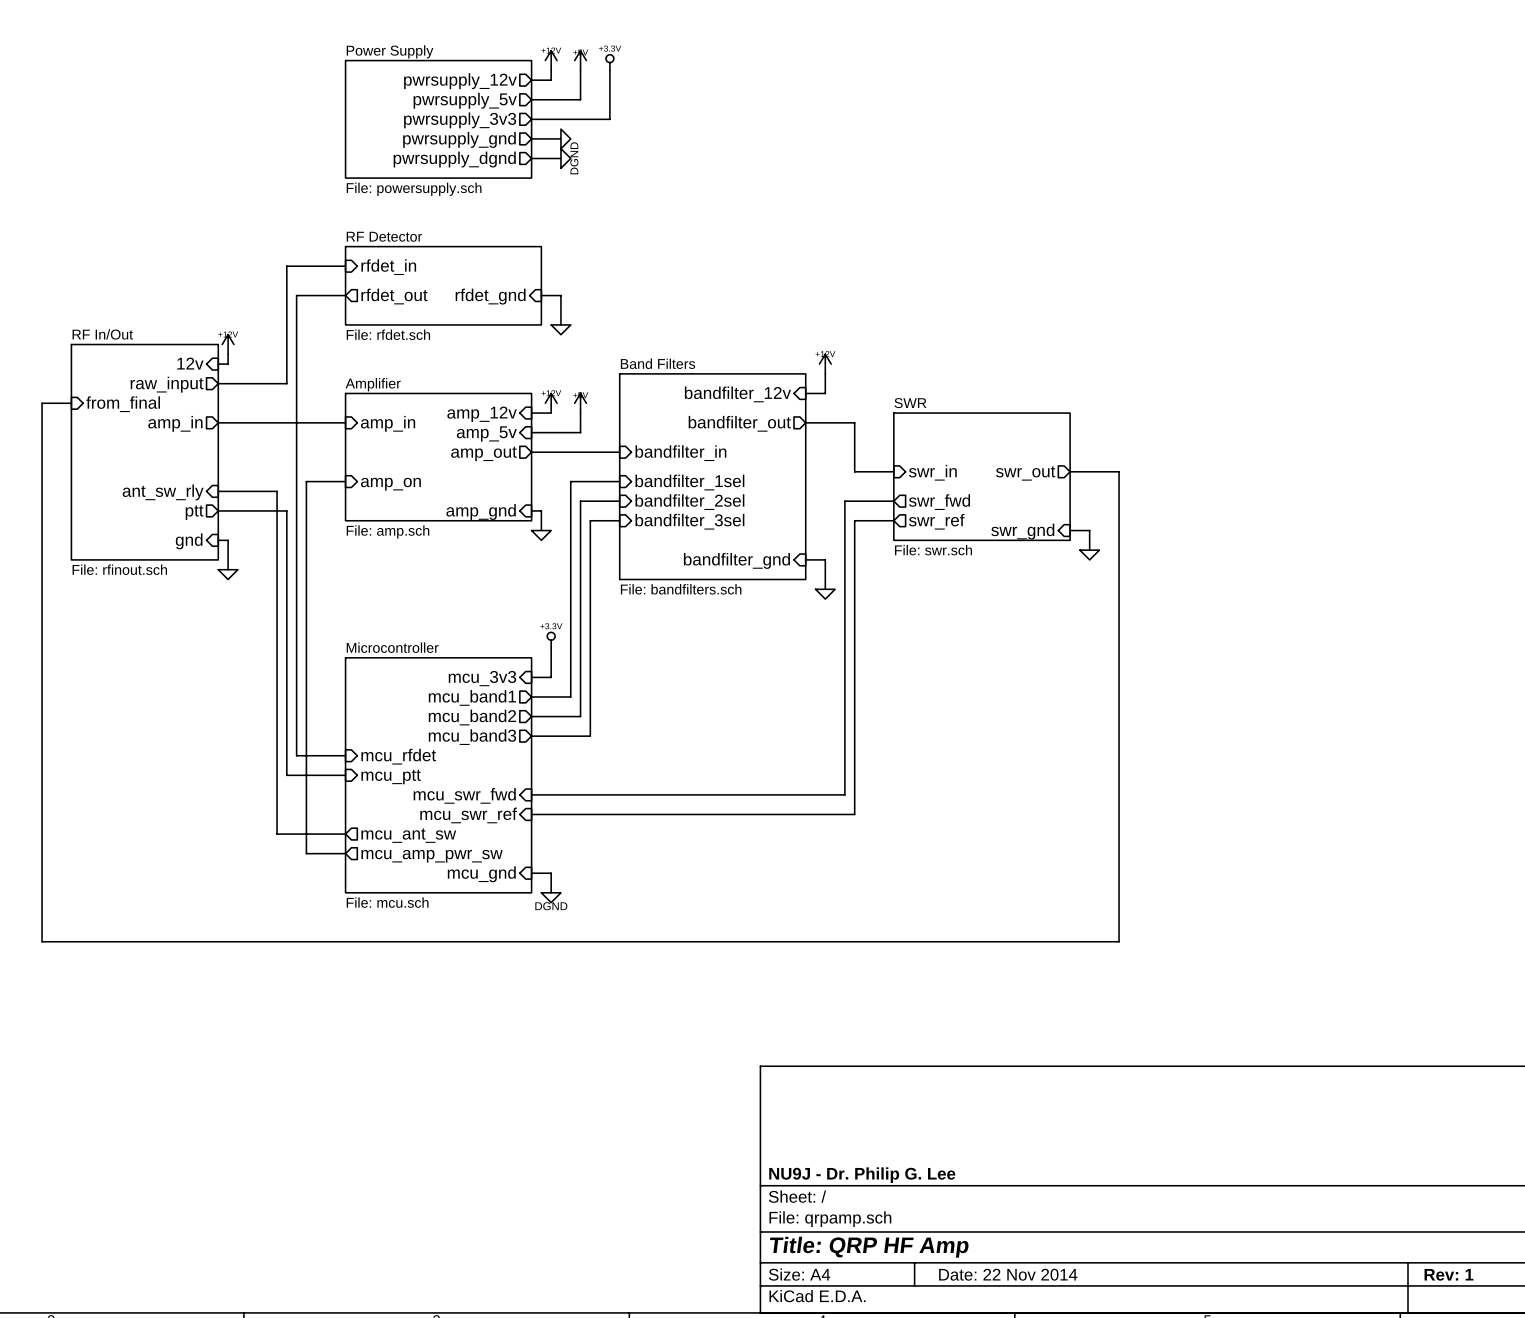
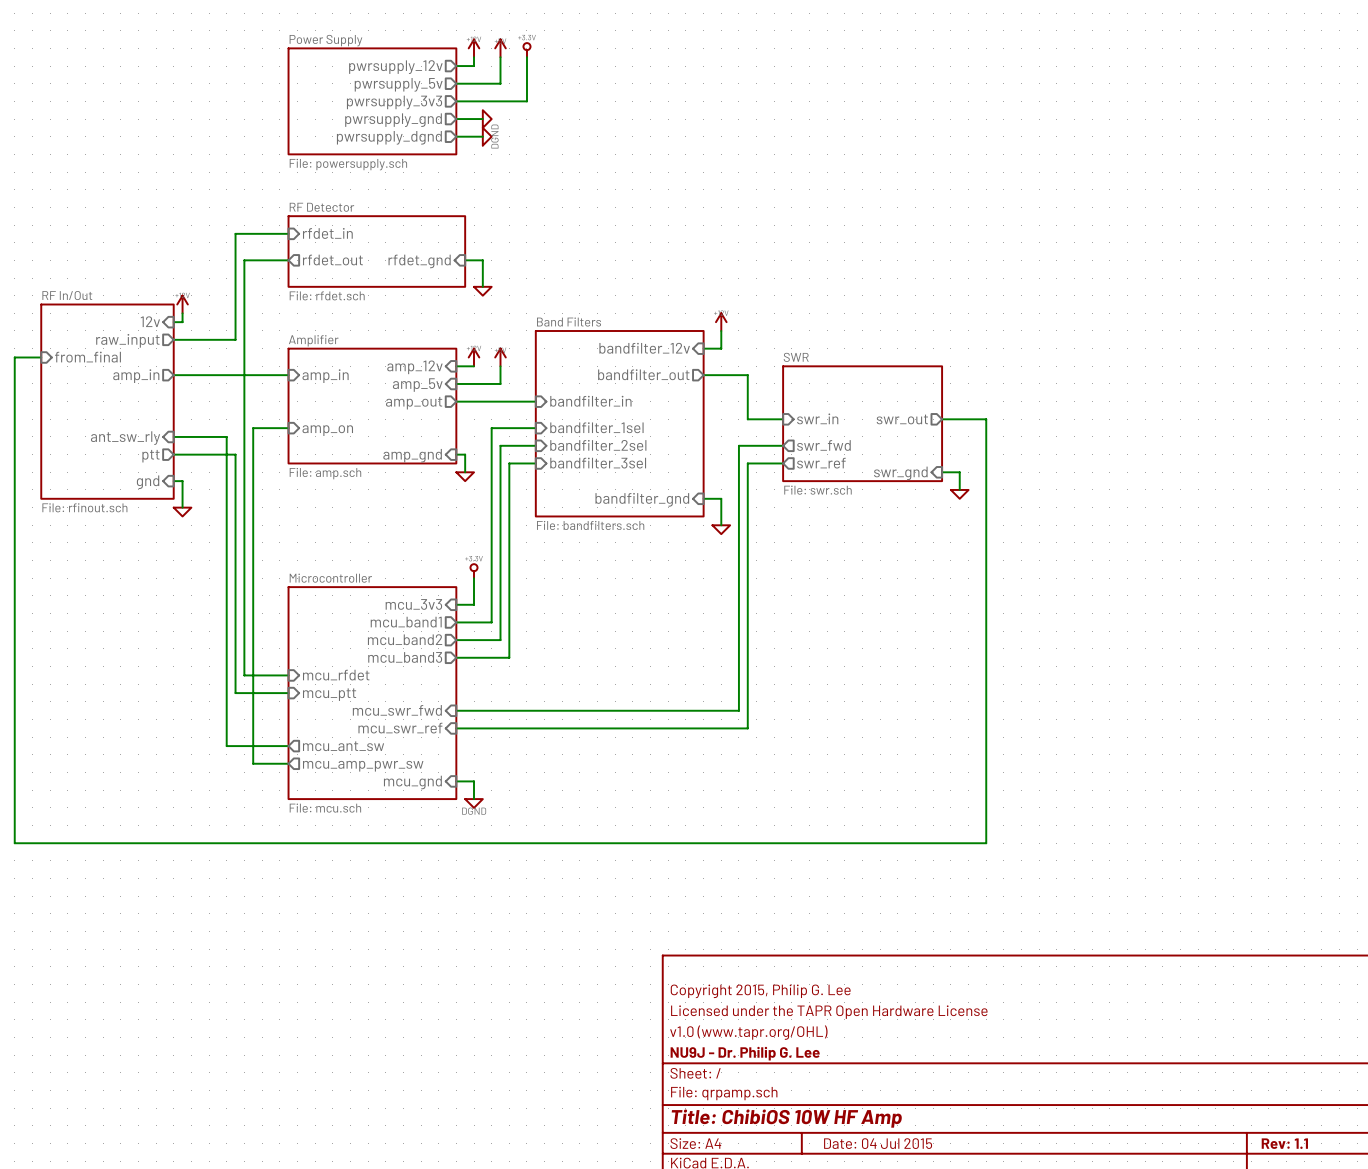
title block: none -> Copyright 2015, Philip G. Lee (760, 991)
title block: none -> Licensed under the TAPR Open Hardware License (829, 1012)
title block: none -> v1.0 (www.tapr.org/OHL) (748, 1032)
title block: Title: QRP HF Amp (869, 1247) -> Title: ChibiOS 10W HF Amp (786, 1118)
title block: Date: 22 Nov 2014 (1008, 1274) -> Date: 04 Jul 2015 (878, 1143)
title block: Rev: 1 (1448, 1274) -> Rev: 1.1 (1284, 1143)

